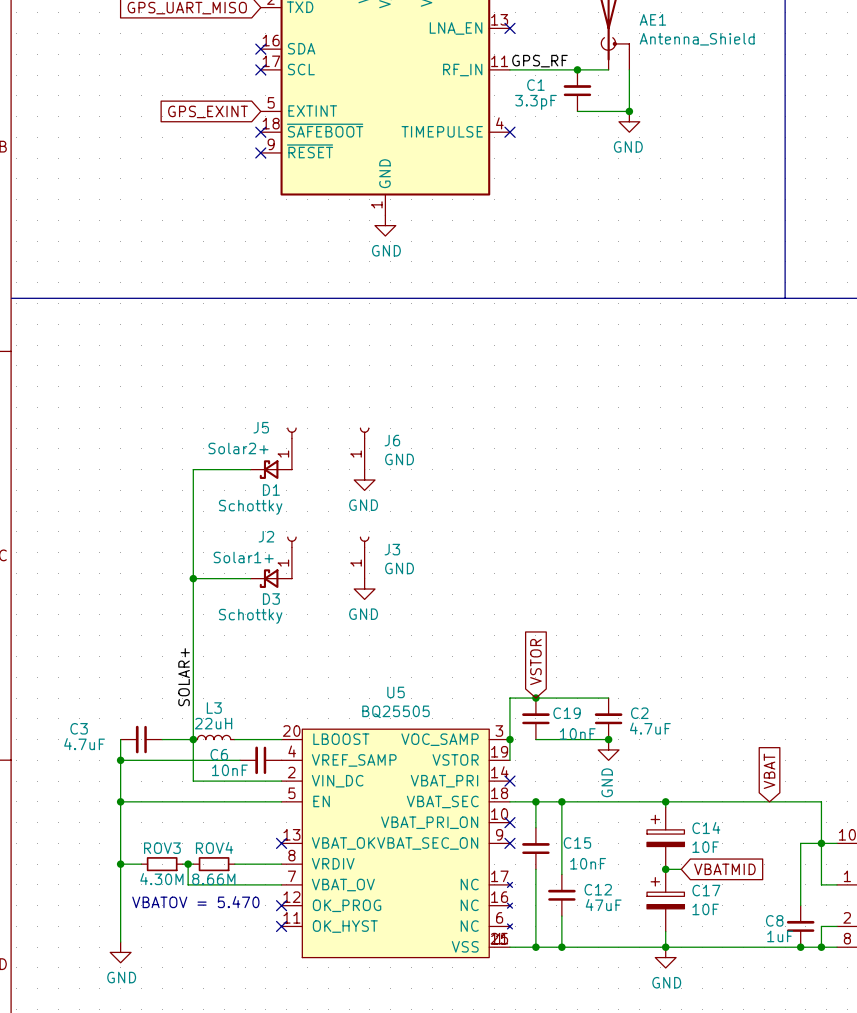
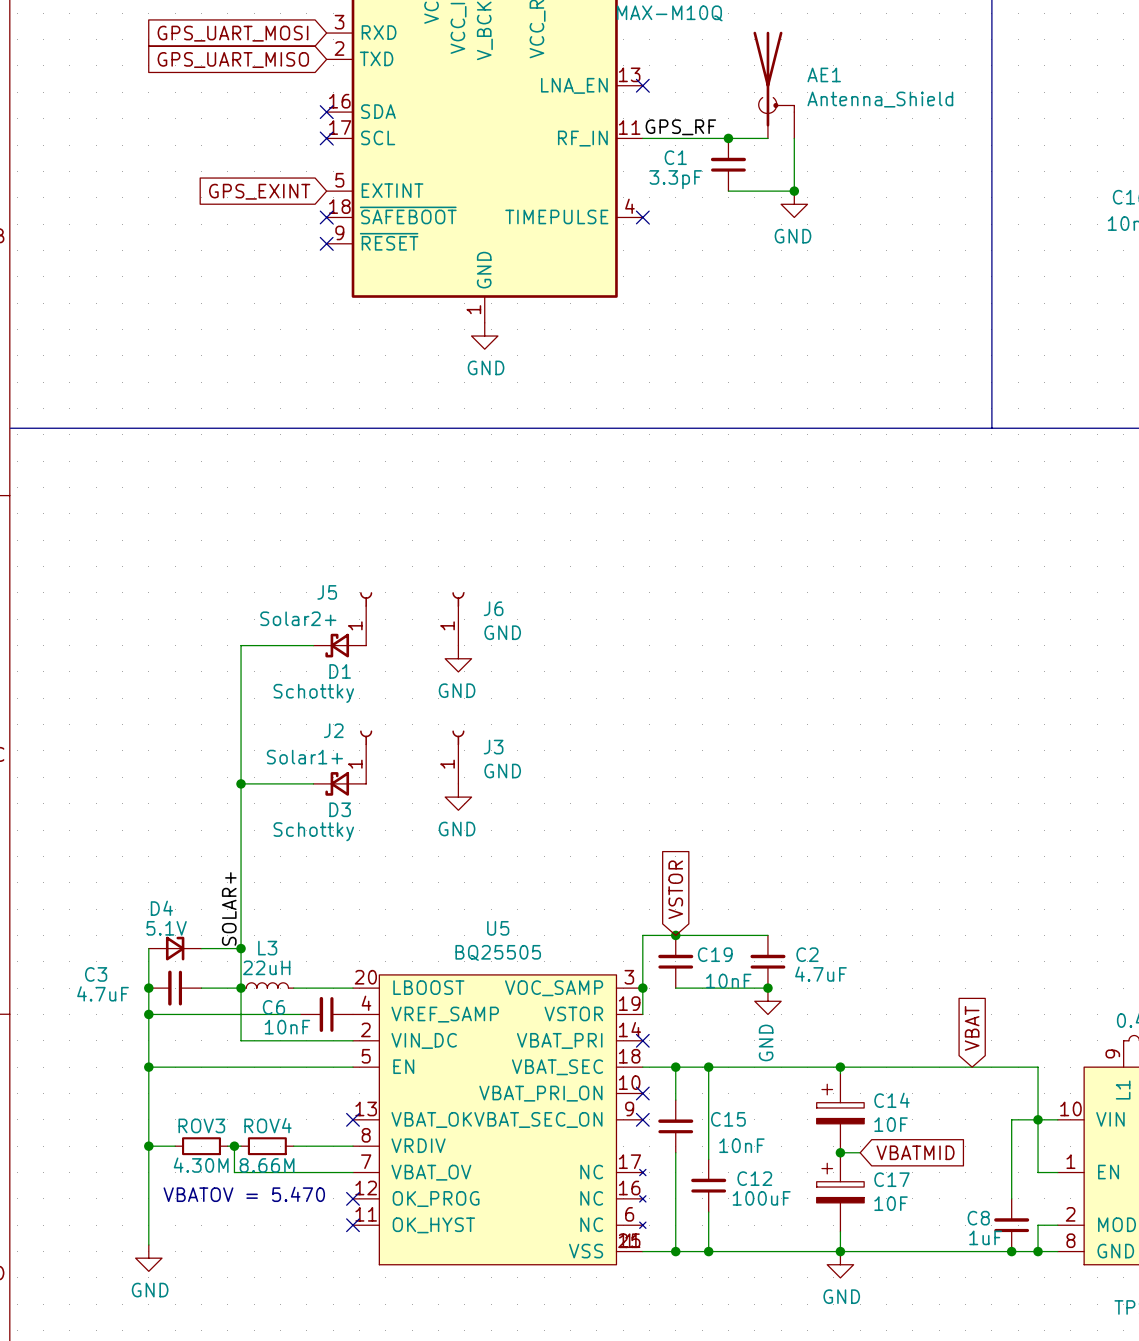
wire: none -> (148, 948) (148, 988)
D4: none -> 5.1V (175, 948)
wire: none -> (201, 948) (241, 948)
junction: none -> (241, 948)
junction: none -> (148, 988)
C12 value: 47uF (603, 905) -> 100uF (761, 1198)

